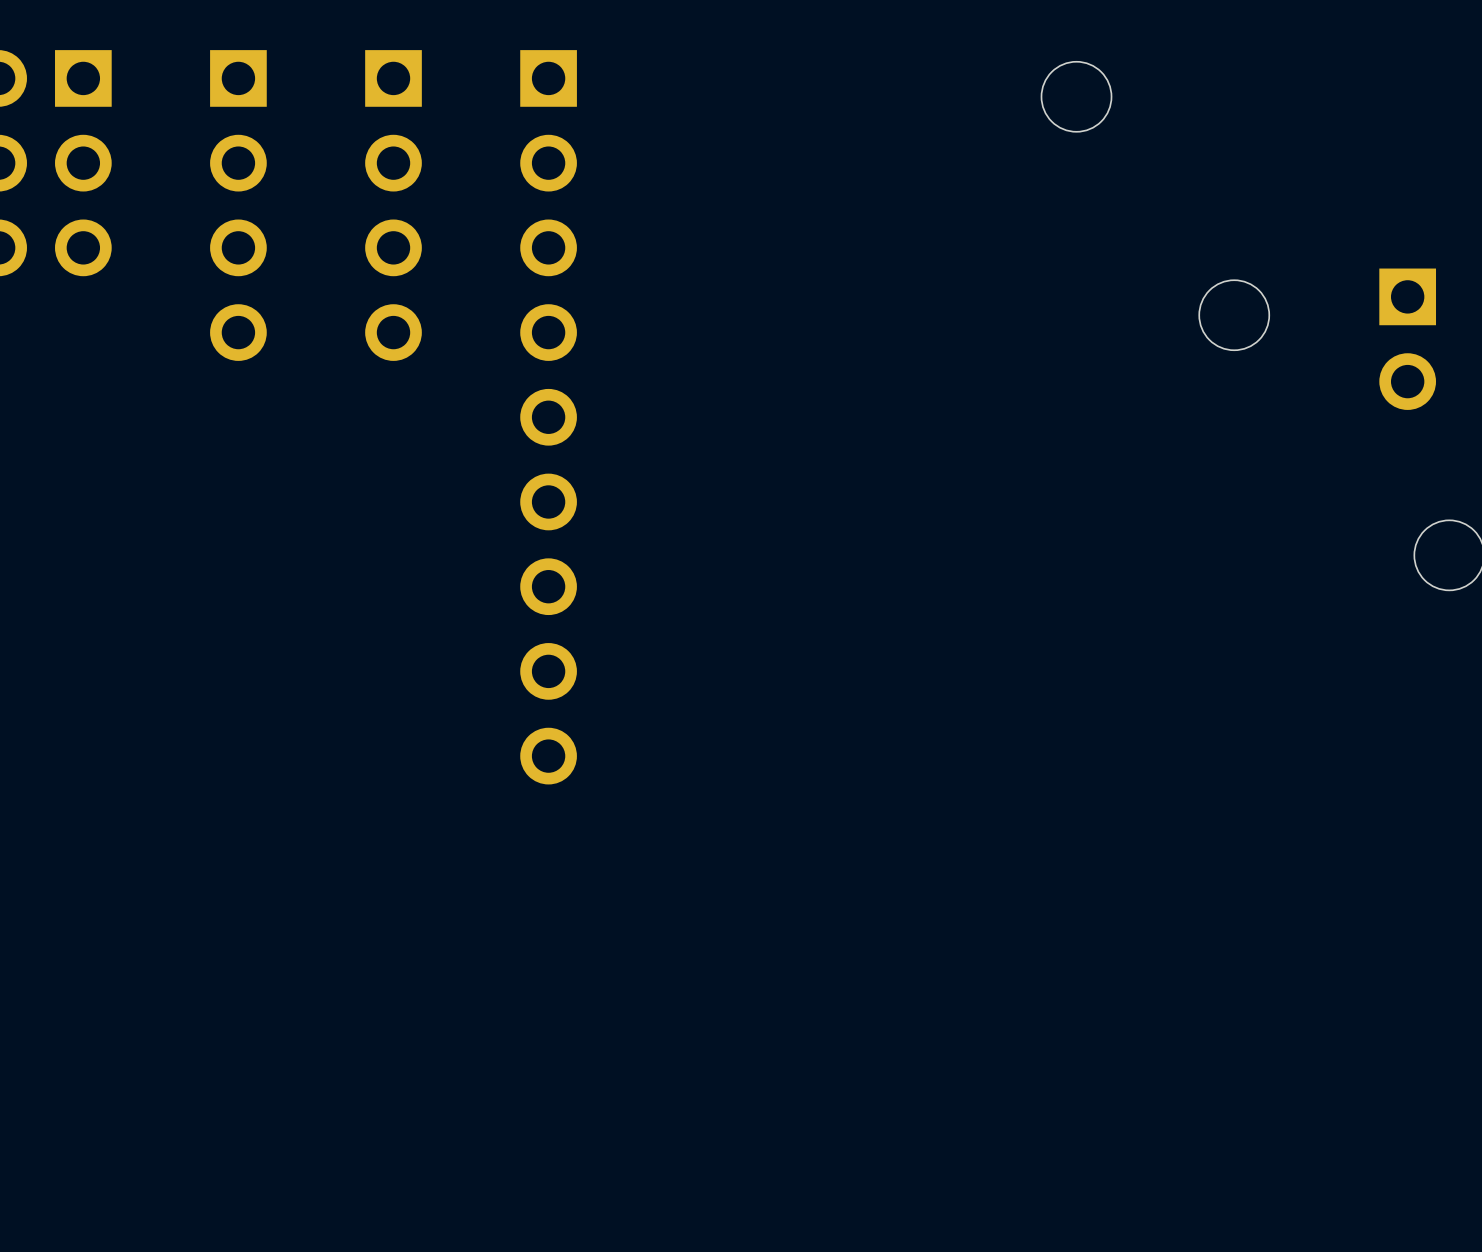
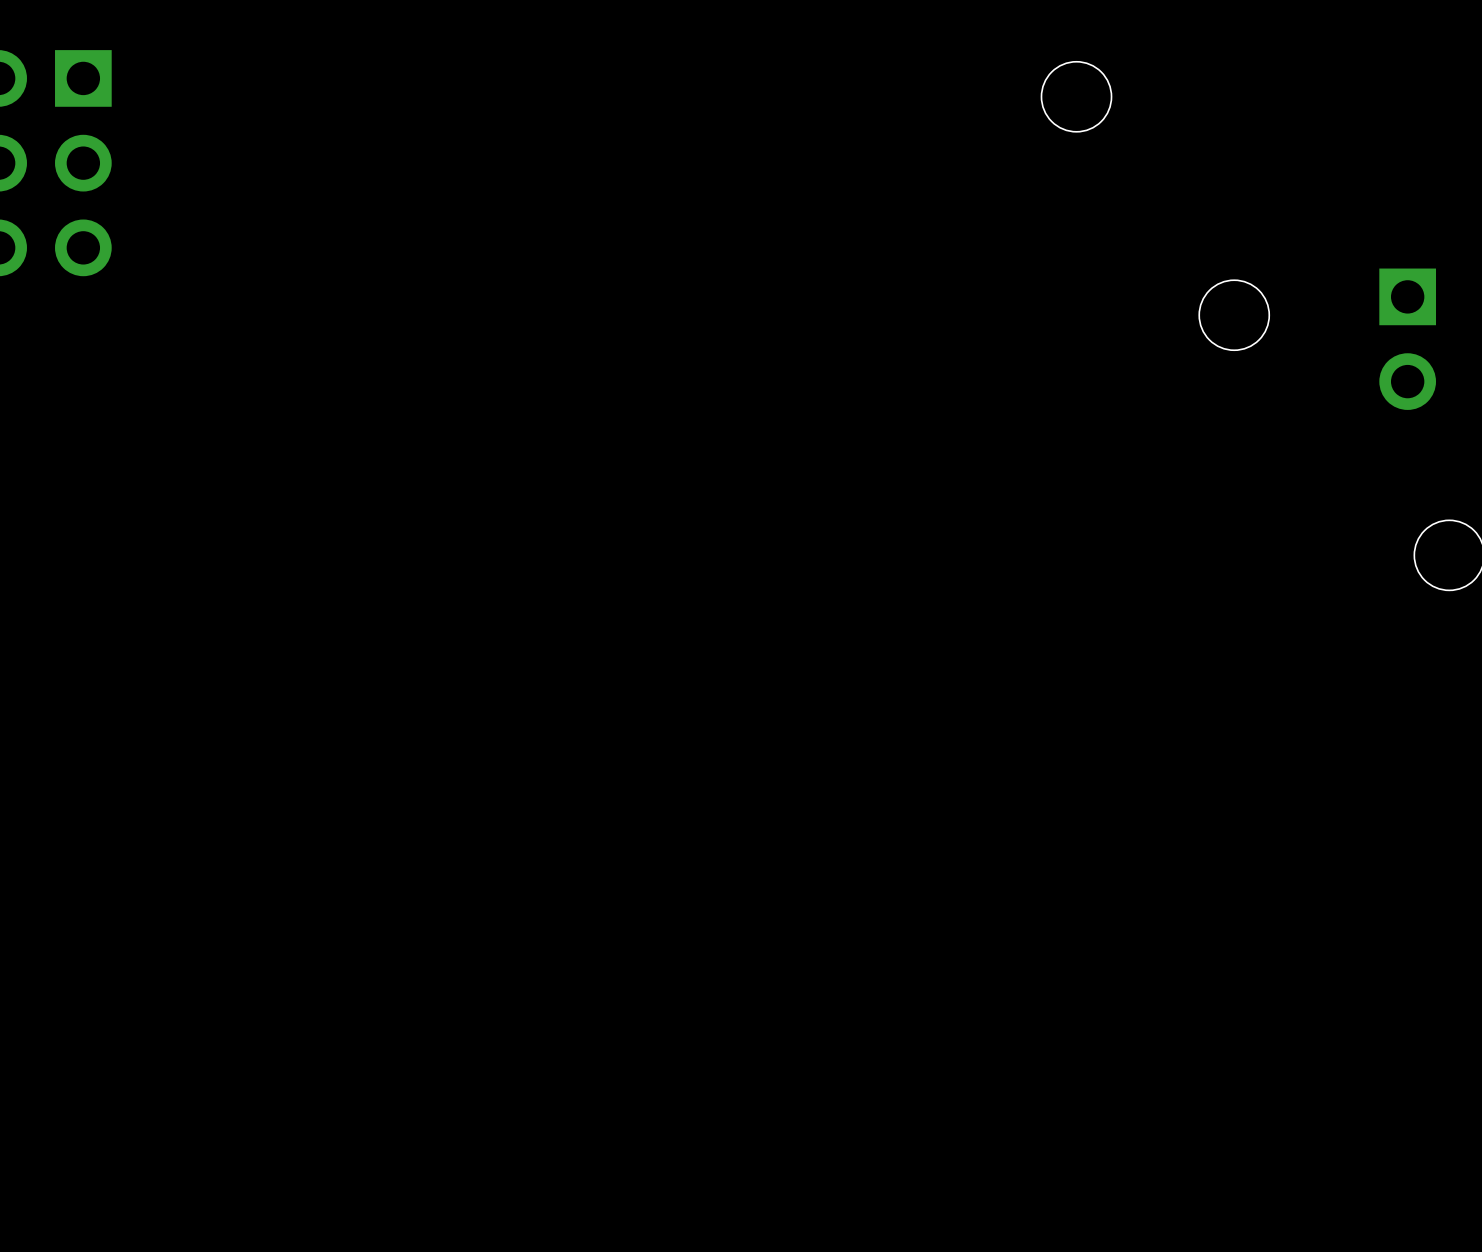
part: (238, 205) -> none
part: (393, 205) -> none
part: (548, 417) -> none

